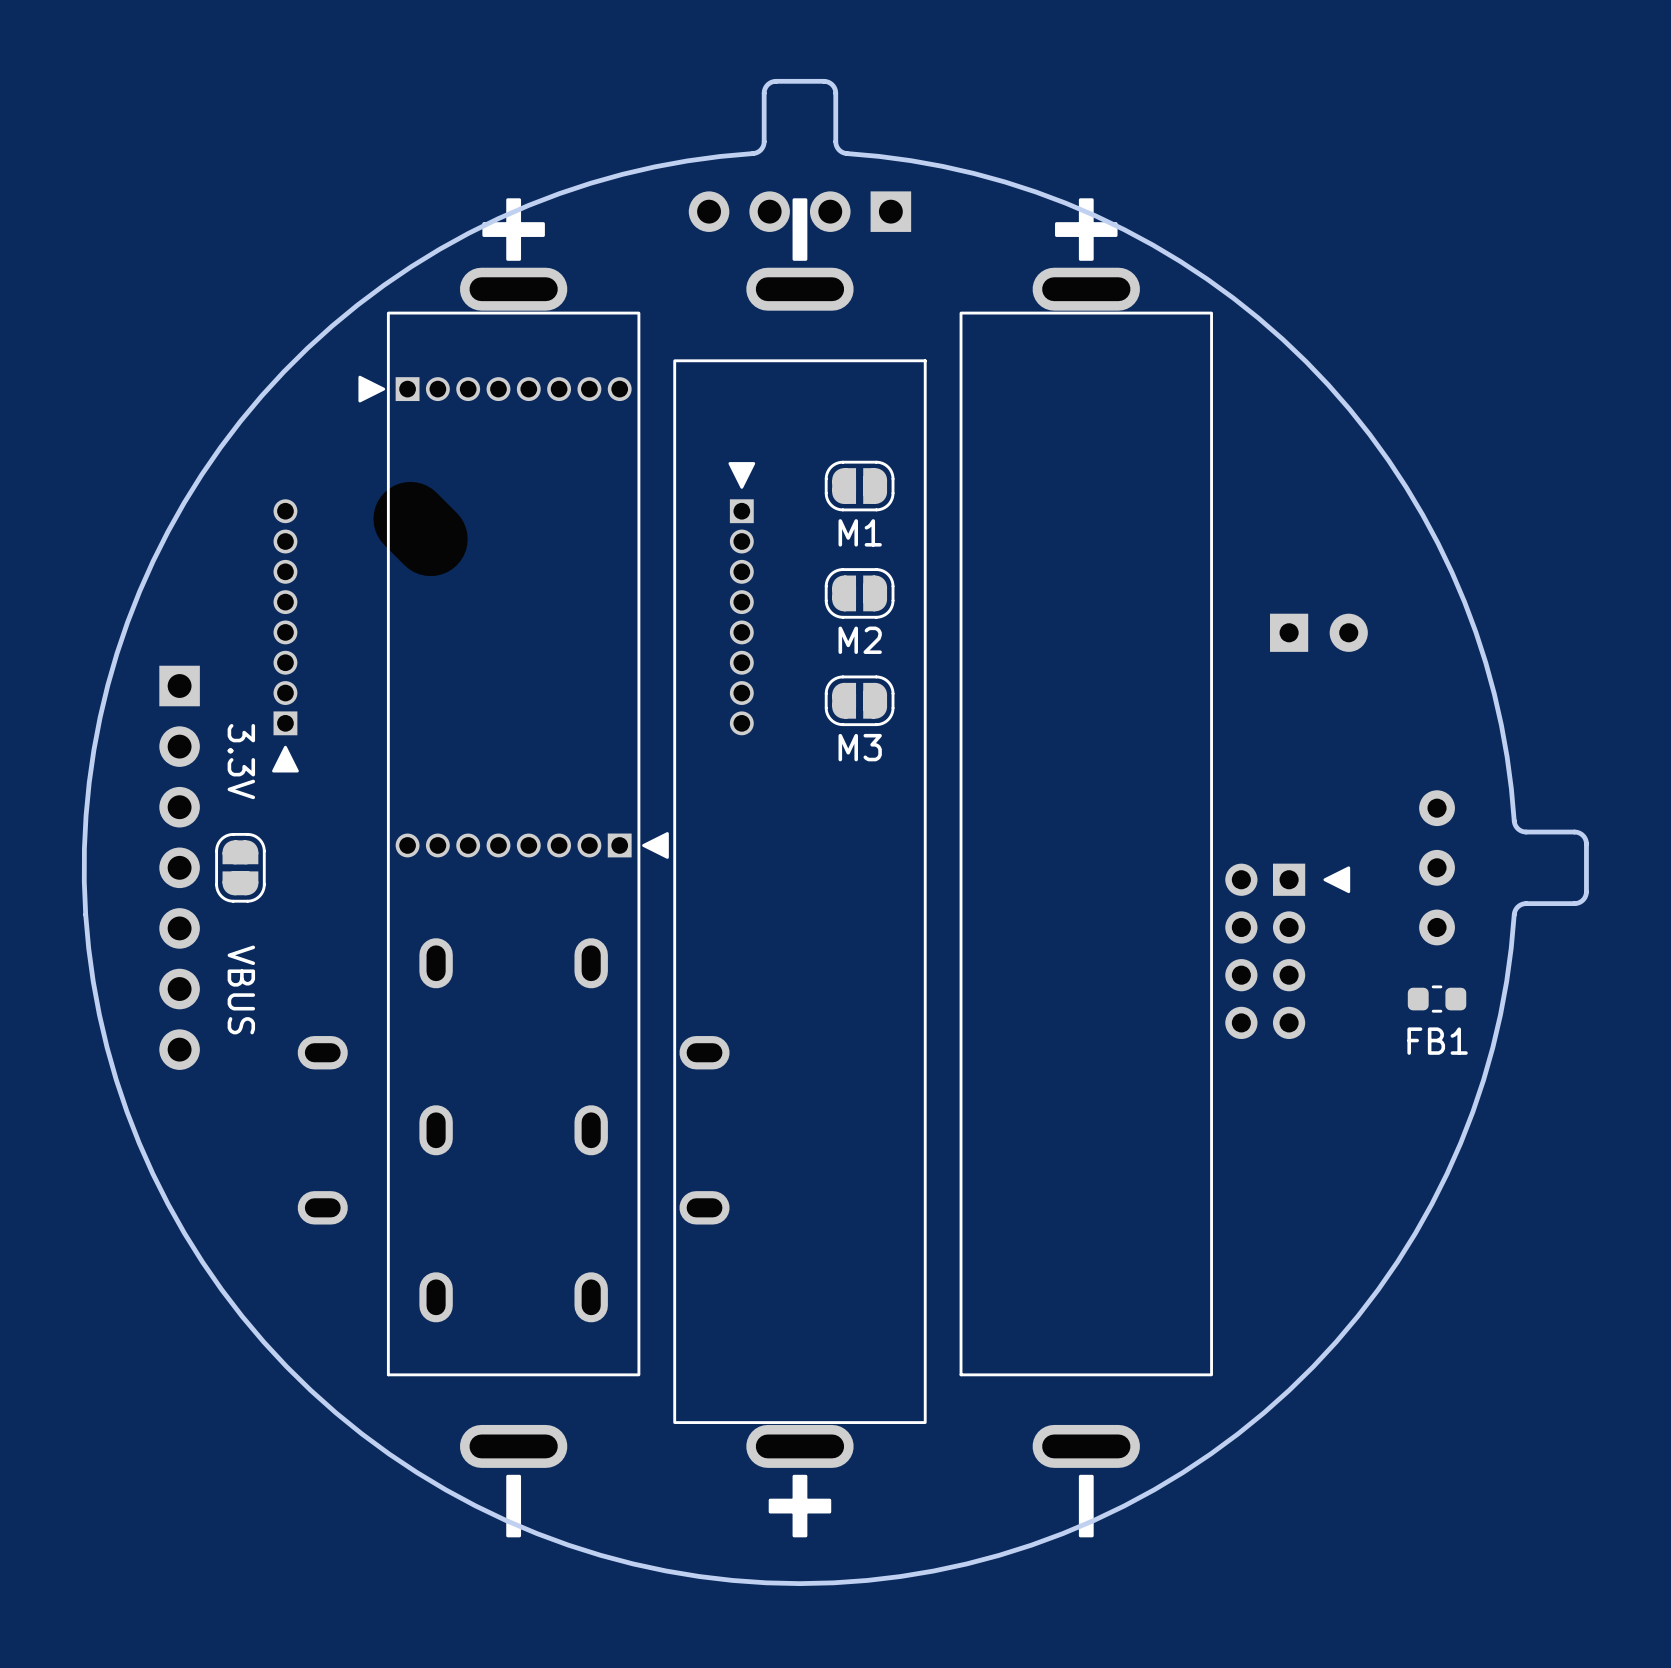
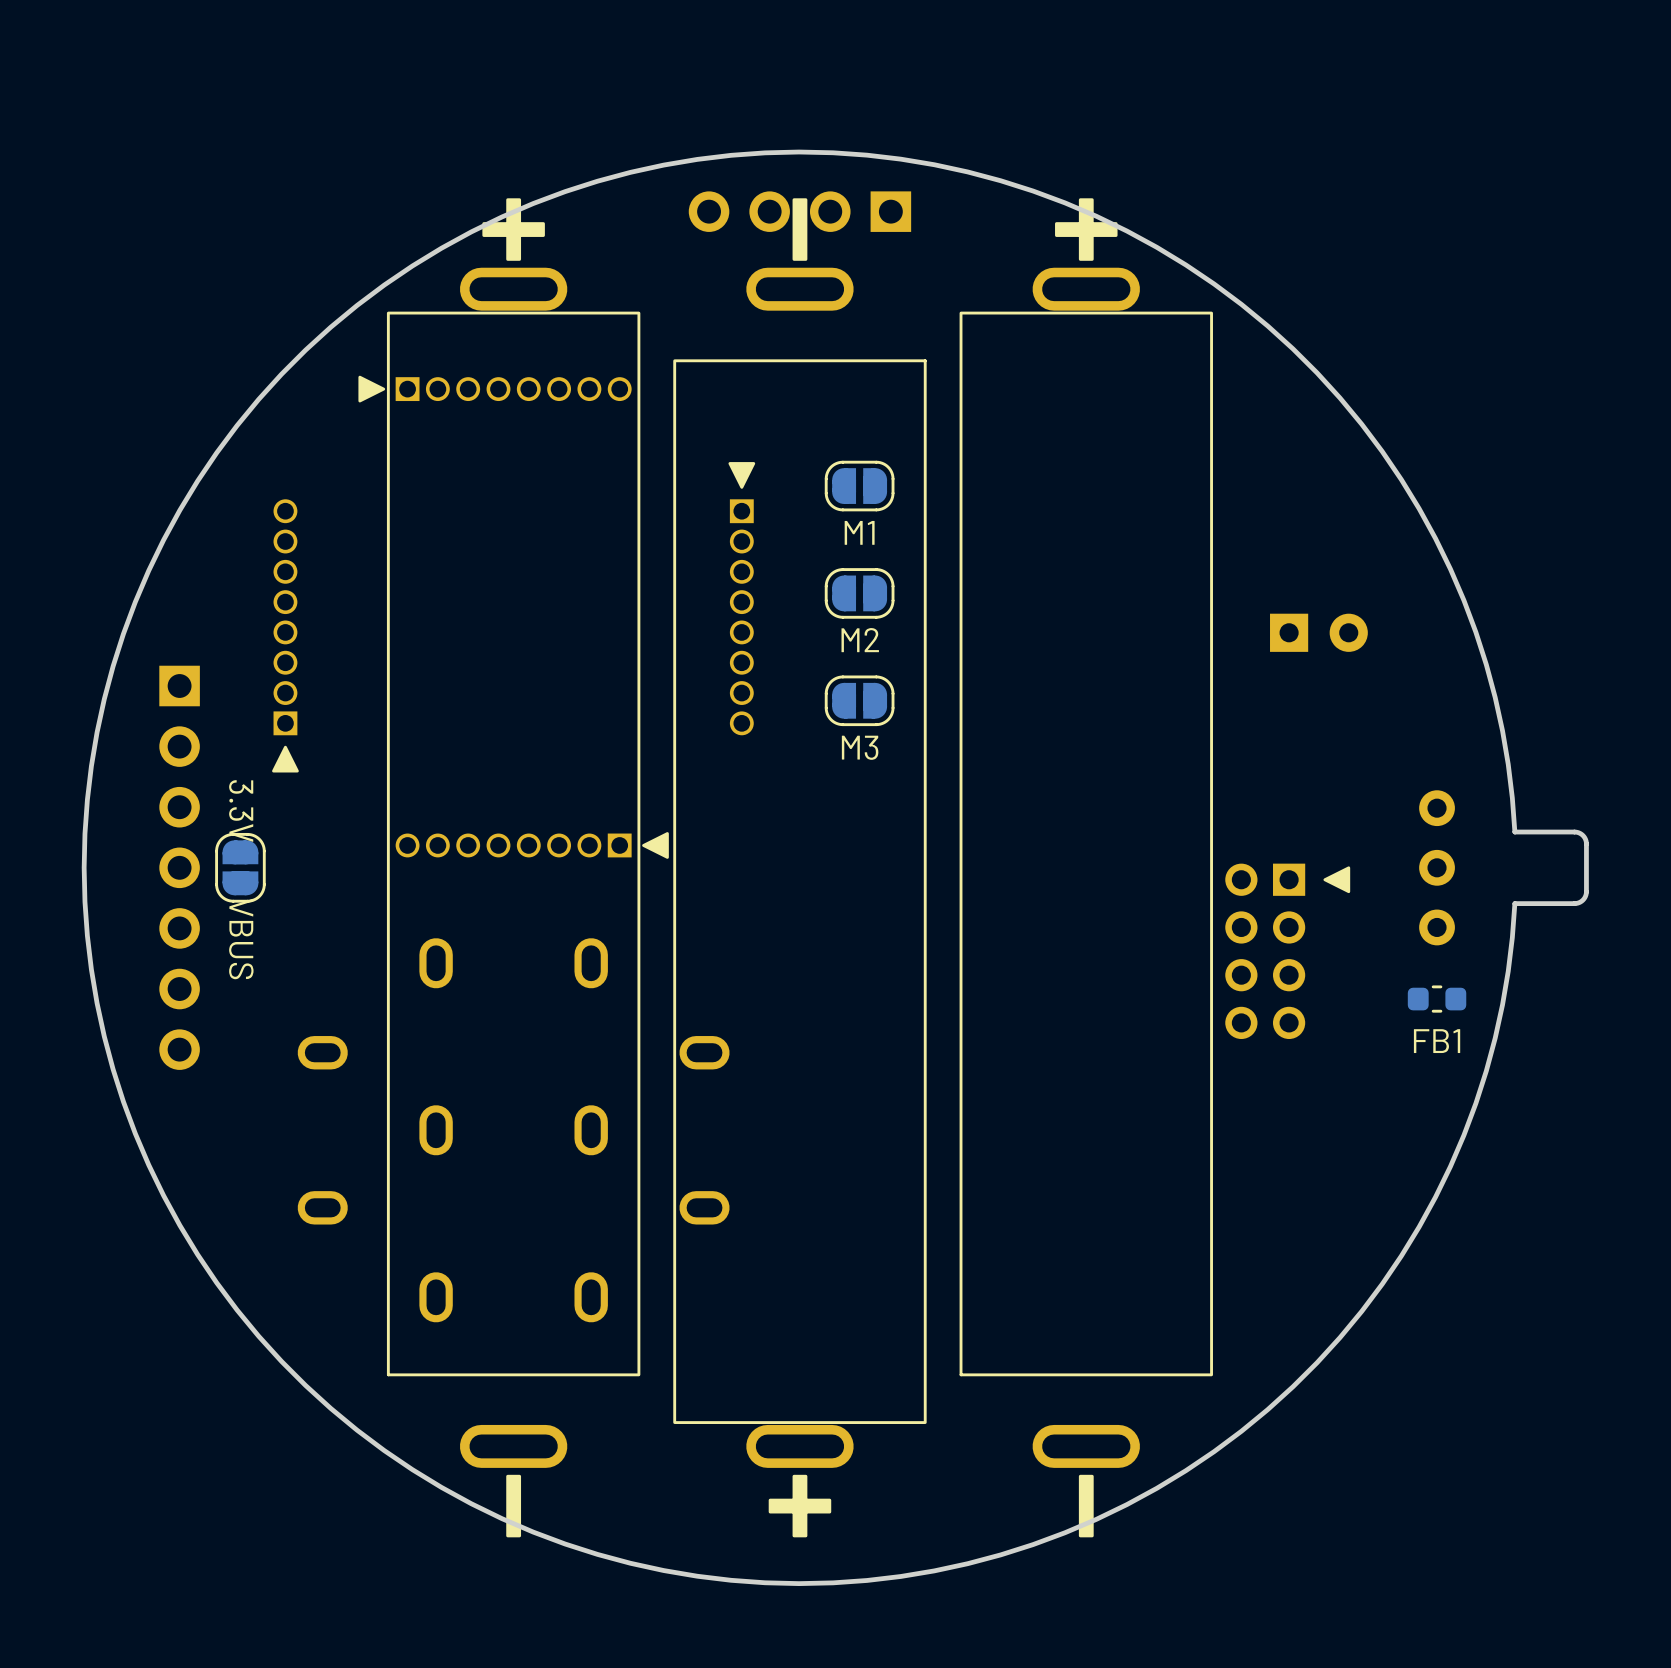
board edge: (1526, 832) (1519, 829) (1514, 823) (1507, 756) (1494, 693) (1475, 632) (1451, 572) (1422, 514) (1388, 460) (1349, 409) (1306, 361) (1258, 318) (1207, 279) (1152, 245) (1095, 215) (1035, 191) (973, 173) (910, 160) (842, 152) (835, 143) (835, 93) (832, 84) (823, 81) (776, 81) (768, 83) (764, 90) (764, 143) (758, 151) (687, 160) (622, 174) (559, 193) (498, 218) (439, 249) (384, 285) (332, 326) (284, 371) (261, 395) (220, 447) (184, 502) (153, 561) (127, 622) (107, 685) (93, 749) (86, 815) (84, 881) (88, 948) (93, 981) (107, 1047) (127, 1111) (152, 1173) (184, 1233) (221, 1289) (263, 1342) (310, 1390) (361, 1433) (417, 1472) (475, 1505) (536, 1533) (600, 1555) (666, 1570) (732, 1580) (799, 1583) (867, 1580) (933, 1570) (999, 1555) (1063, 1533) (1124, 1505) (1182, 1472) (1237, 1433) (1289, 1390) (1336, 1342) (1378, 1289) (1415, 1233) (1447, 1173) (1472, 1111) (1483, 1079) (1500, 1014) (1506, 981) (1514, 913) (1519, 905) (1526, 903) -> (1526, 832) (1514, 832) (1508, 764) (1495, 697) (1475, 632) (1450, 569) (1419, 508) (1382, 451) (1340, 398) (1292, 348) (1241, 304) (1185, 264) (1126, 231) (1064, 202) (1000, 180) (934, 164) (867, 155) (799, 152) (731, 155) (663, 165) (597, 181) (533, 203) (471, 231) (412, 265) (357, 305) (305, 350) (281, 374) (237, 425) (197, 481) (163, 540) (135, 601) (113, 666) (97, 732) (87, 799) (84, 867) (87, 935) (97, 1003) (113, 1069) (135, 1133) (163, 1195) (197, 1254) (237, 1310) (281, 1361) (330, 1408) (384, 1450) (441, 1487) (502, 1518) (565, 1544) (630, 1563) (663, 1570) (731, 1580) (799, 1583) (867, 1580) (934, 1570) (1000, 1554) (1064, 1532) (1126, 1504) (1185, 1470) (1241, 1431) (1292, 1386) (1340, 1337) (1382, 1284) (1419, 1226) (1450, 1166) (1475, 1103) (1495, 1038) (1508, 971) (1514, 903) (1526, 903)

